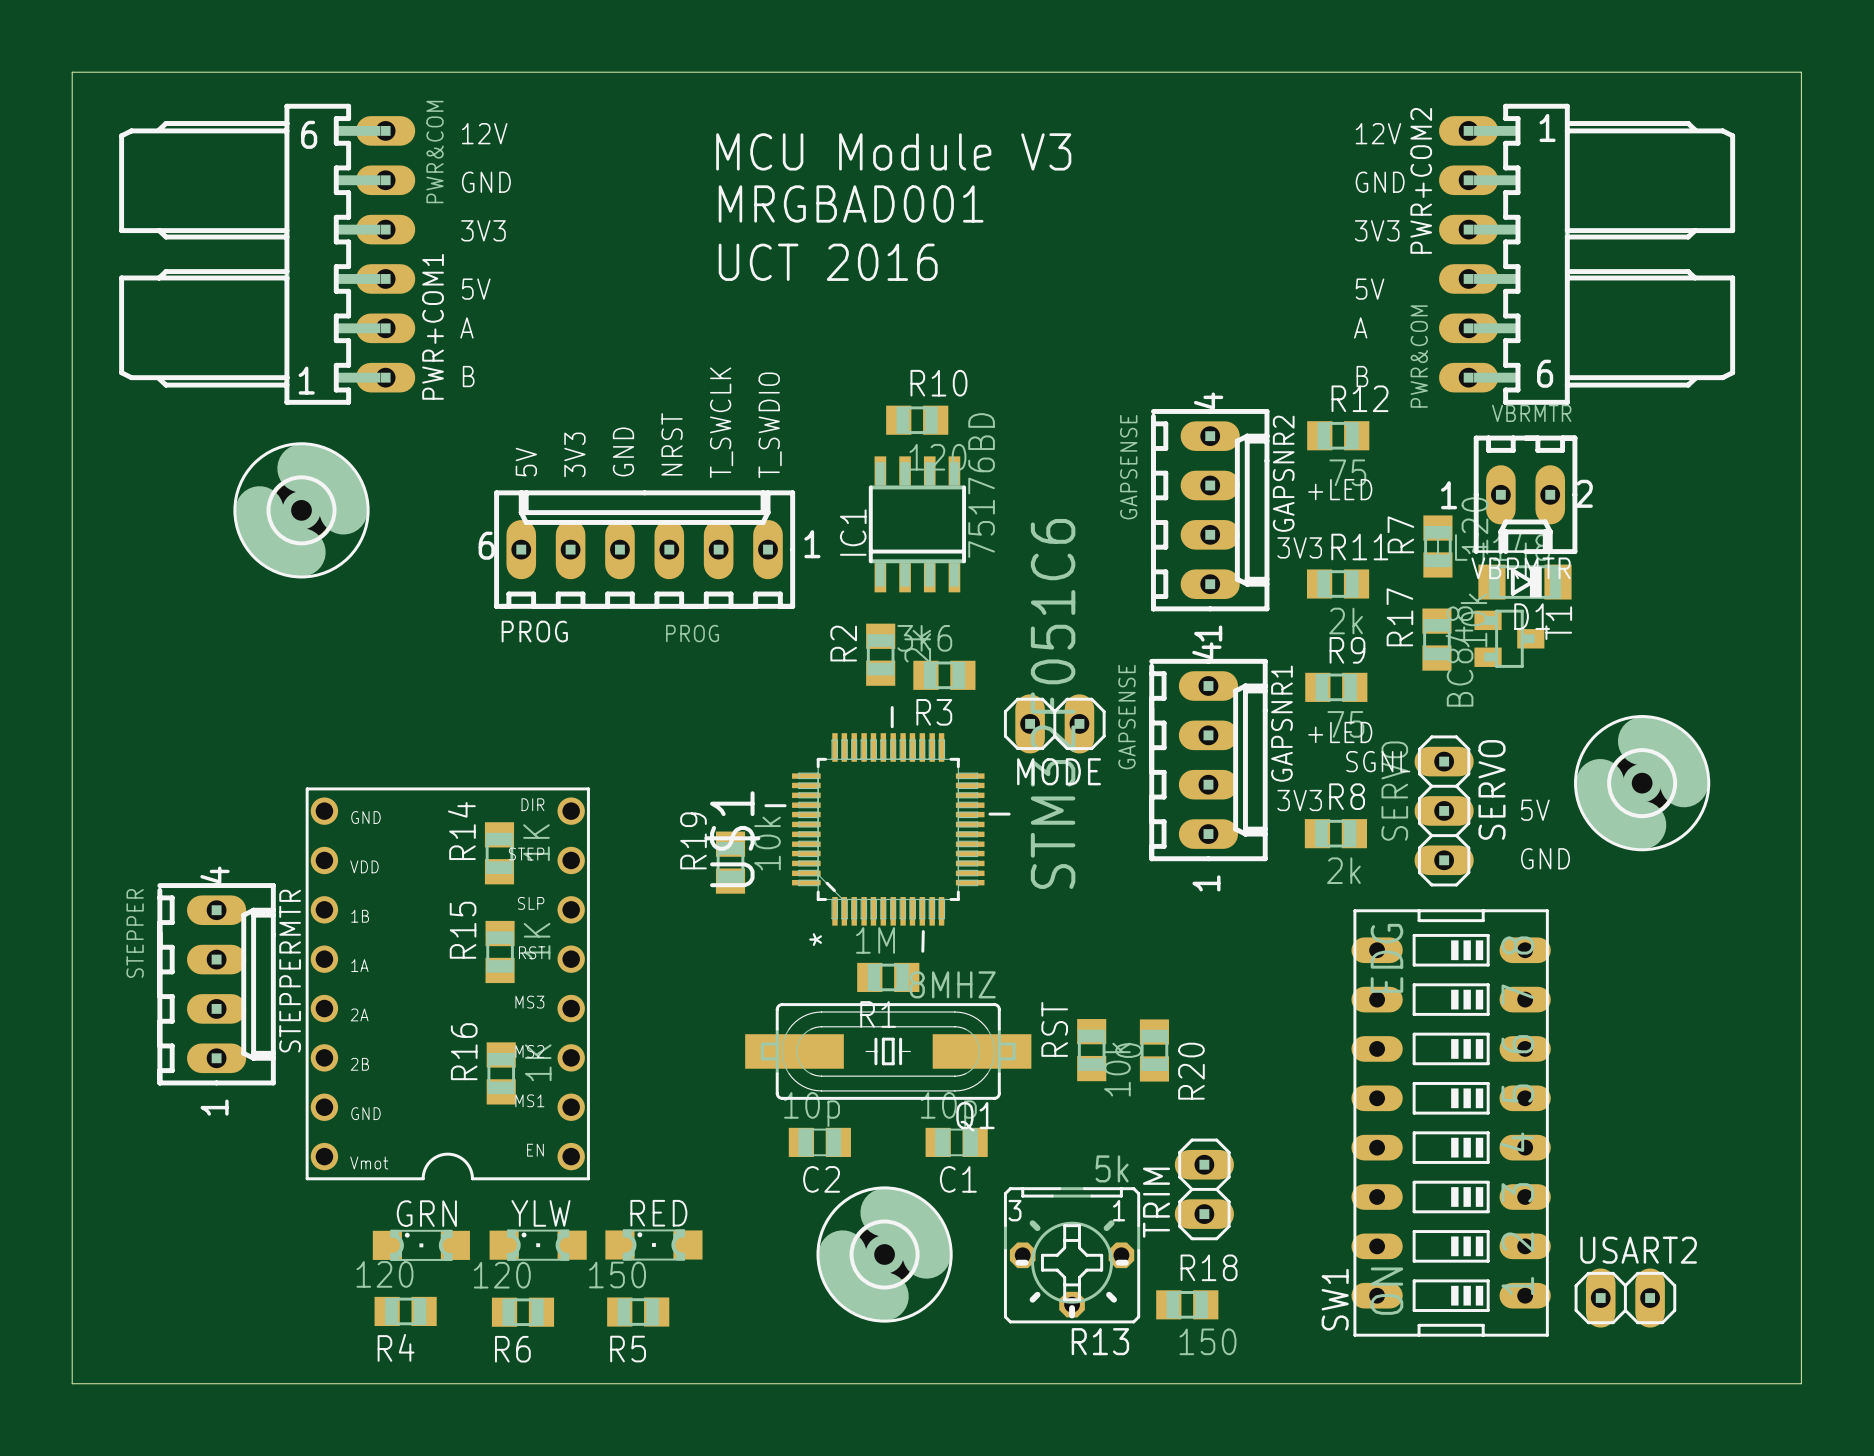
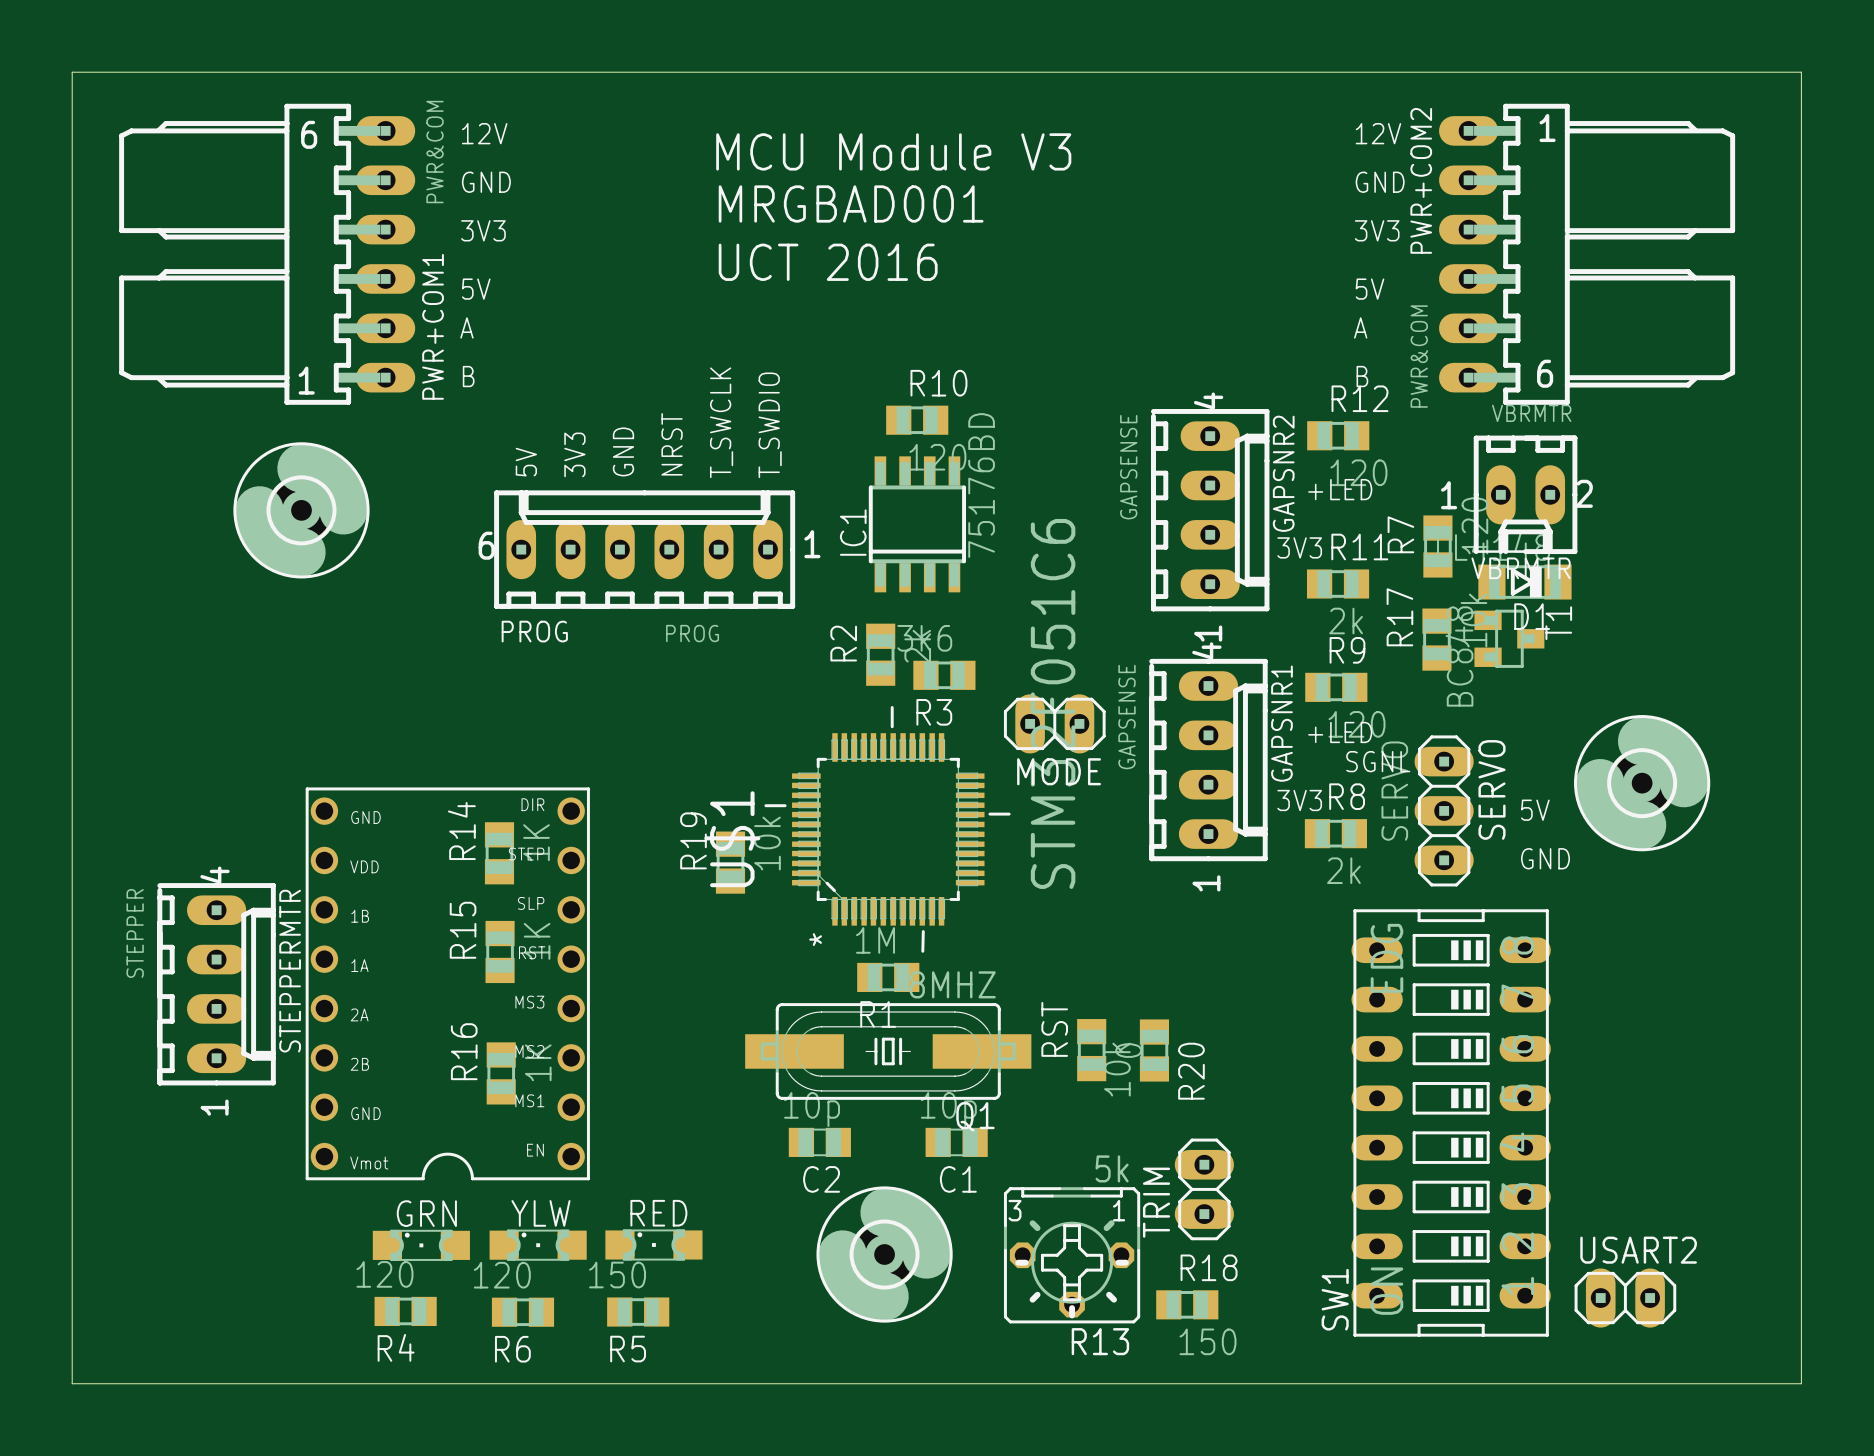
R12 value: 75 (1347, 472) -> 120 (1358, 472)
R9 value: 75 (1345, 724) -> 120 (1356, 724)

